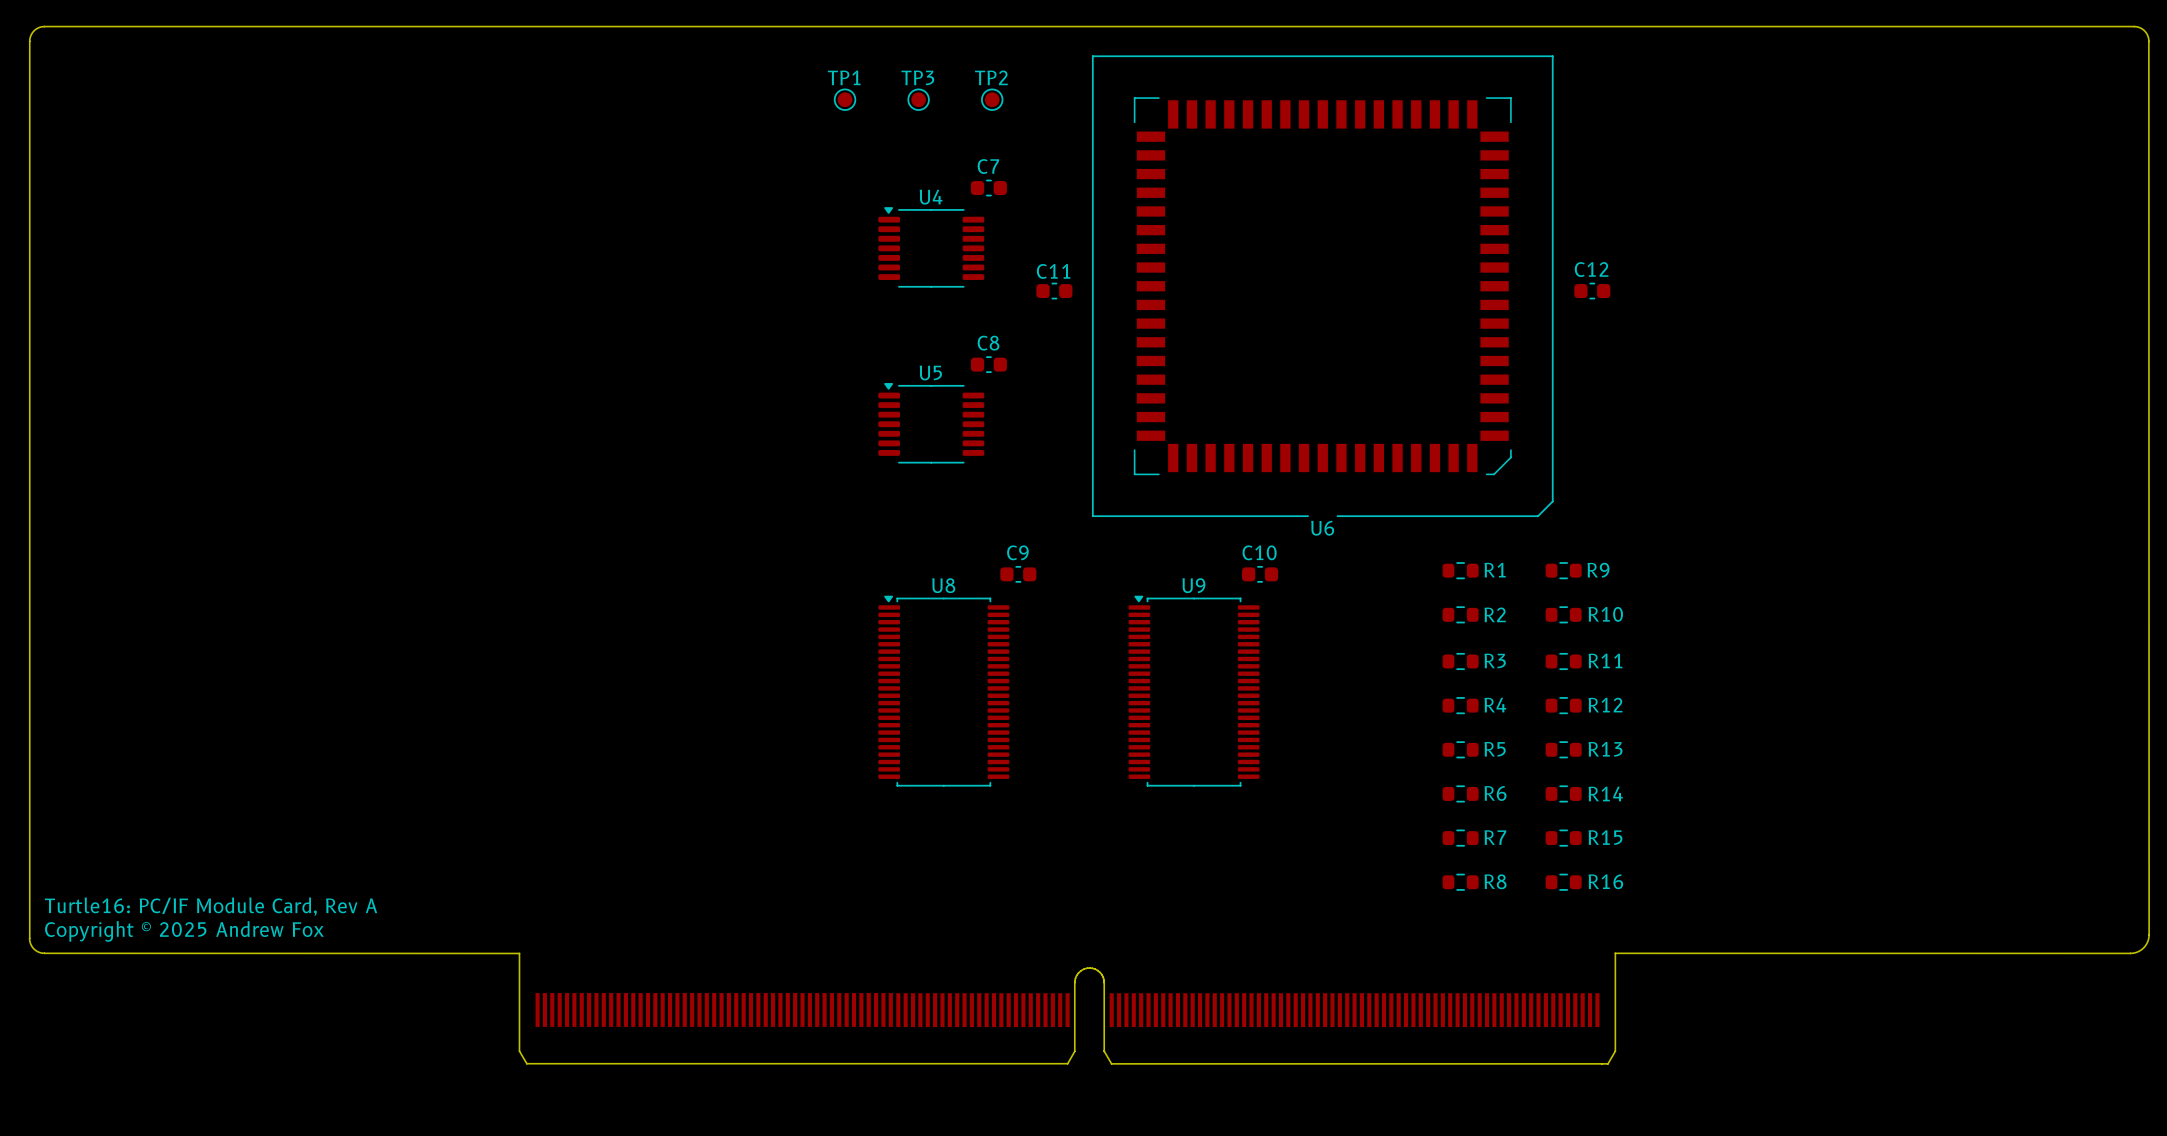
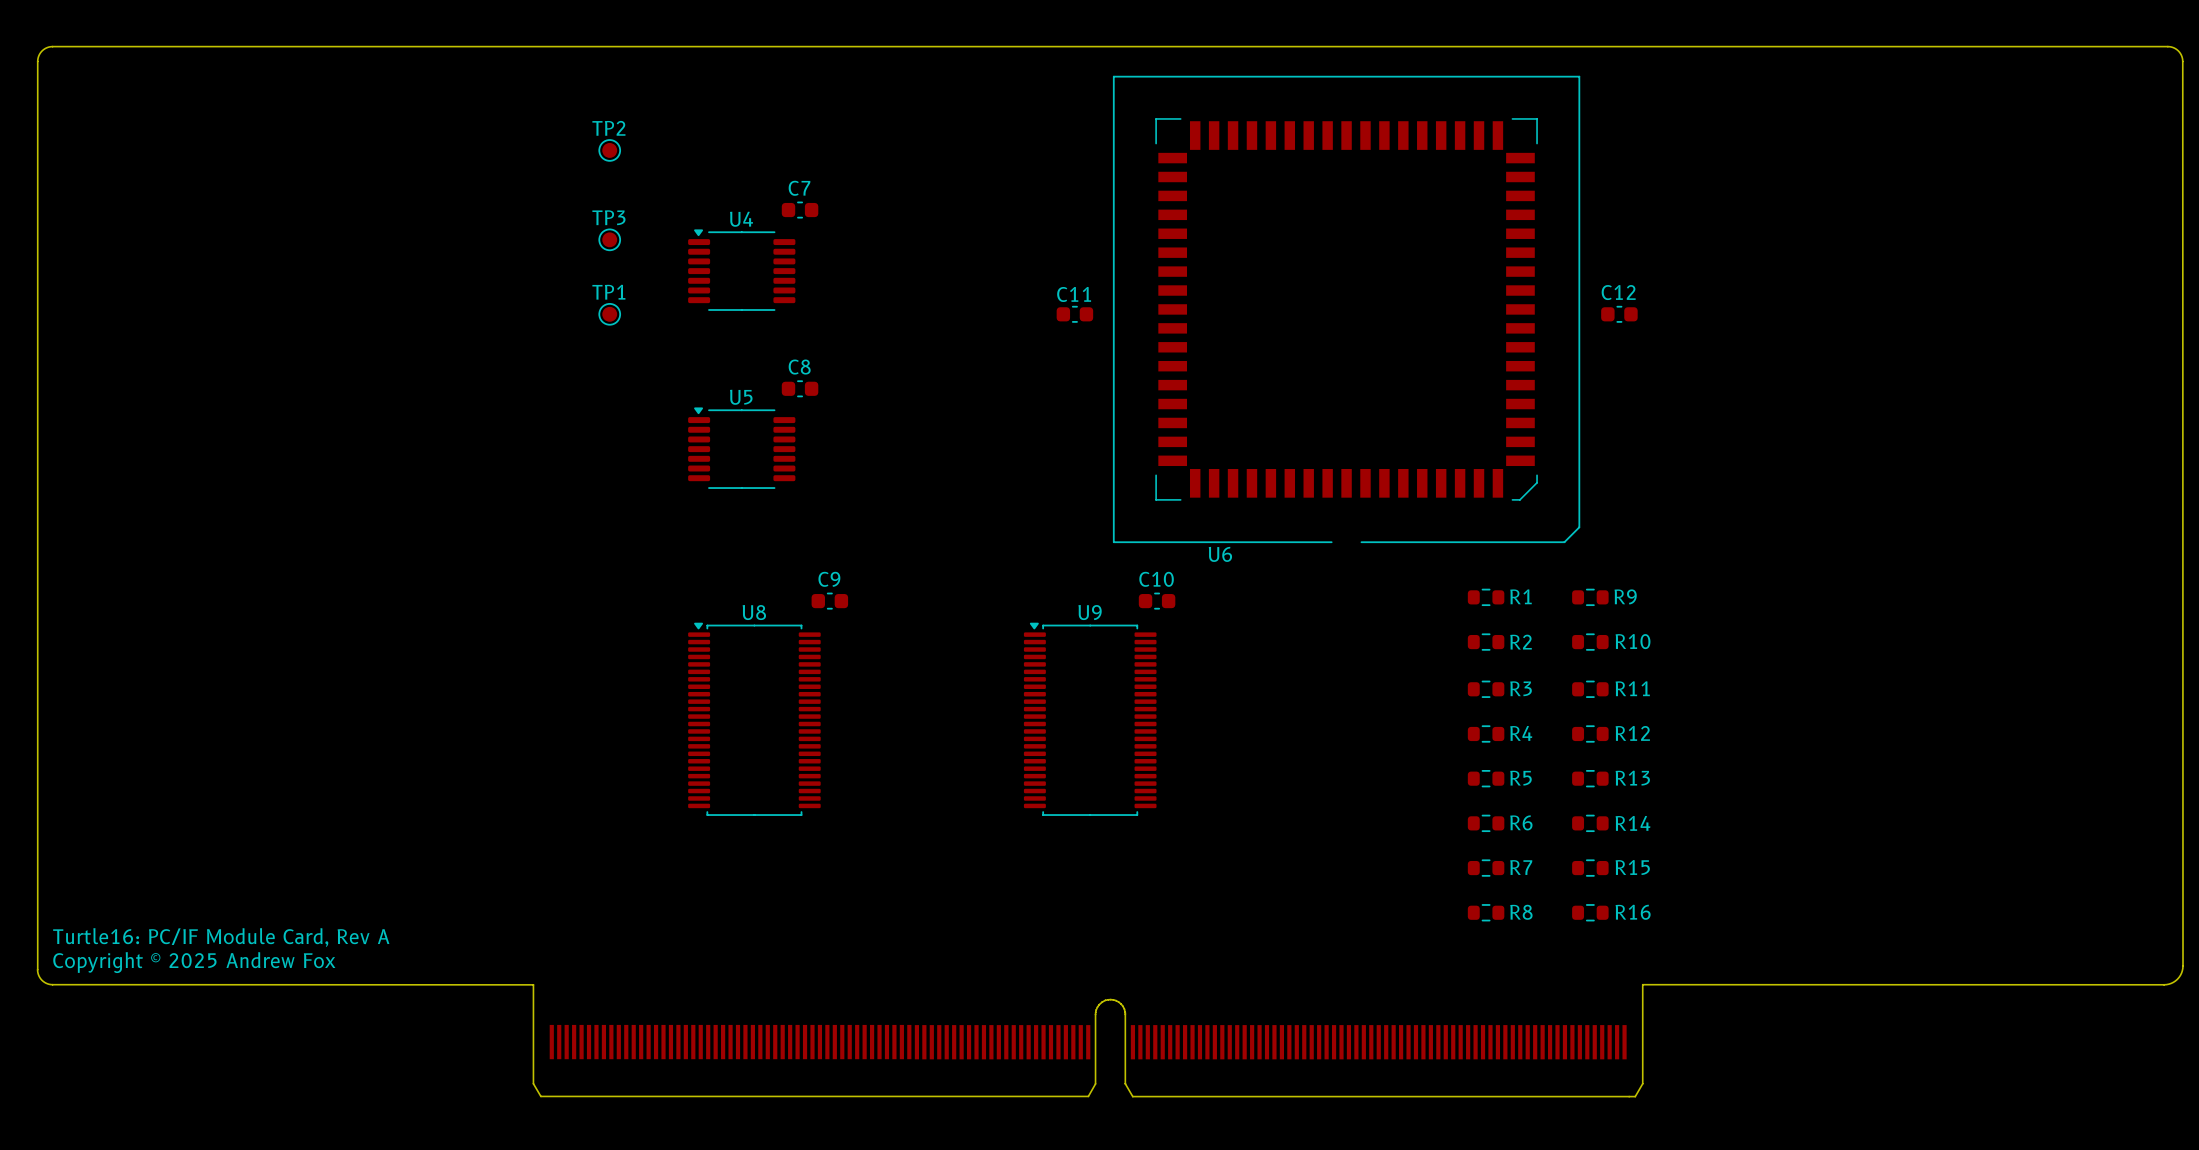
TP1 position: (845, 99) -> (609, 314)
TP3 position: (918, 99) -> (609, 239)
TP2 position: (992, 99) -> (609, 150)
C7 position: (988, 188) -> (800, 210)
U4 position: (931, 247) -> (741, 270)
C8 position: (988, 364) -> (800, 388)
U5 position: (931, 423) -> (741, 448)
U6 name position: U6 (1322, 528) -> U6 (1220, 554)
C9 position: (1018, 574) -> (829, 601)
C10 position: (1260, 574) -> (1157, 601)
U8 position: (943, 691) -> (754, 719)
U9 position: (1194, 691) -> (1090, 719)

